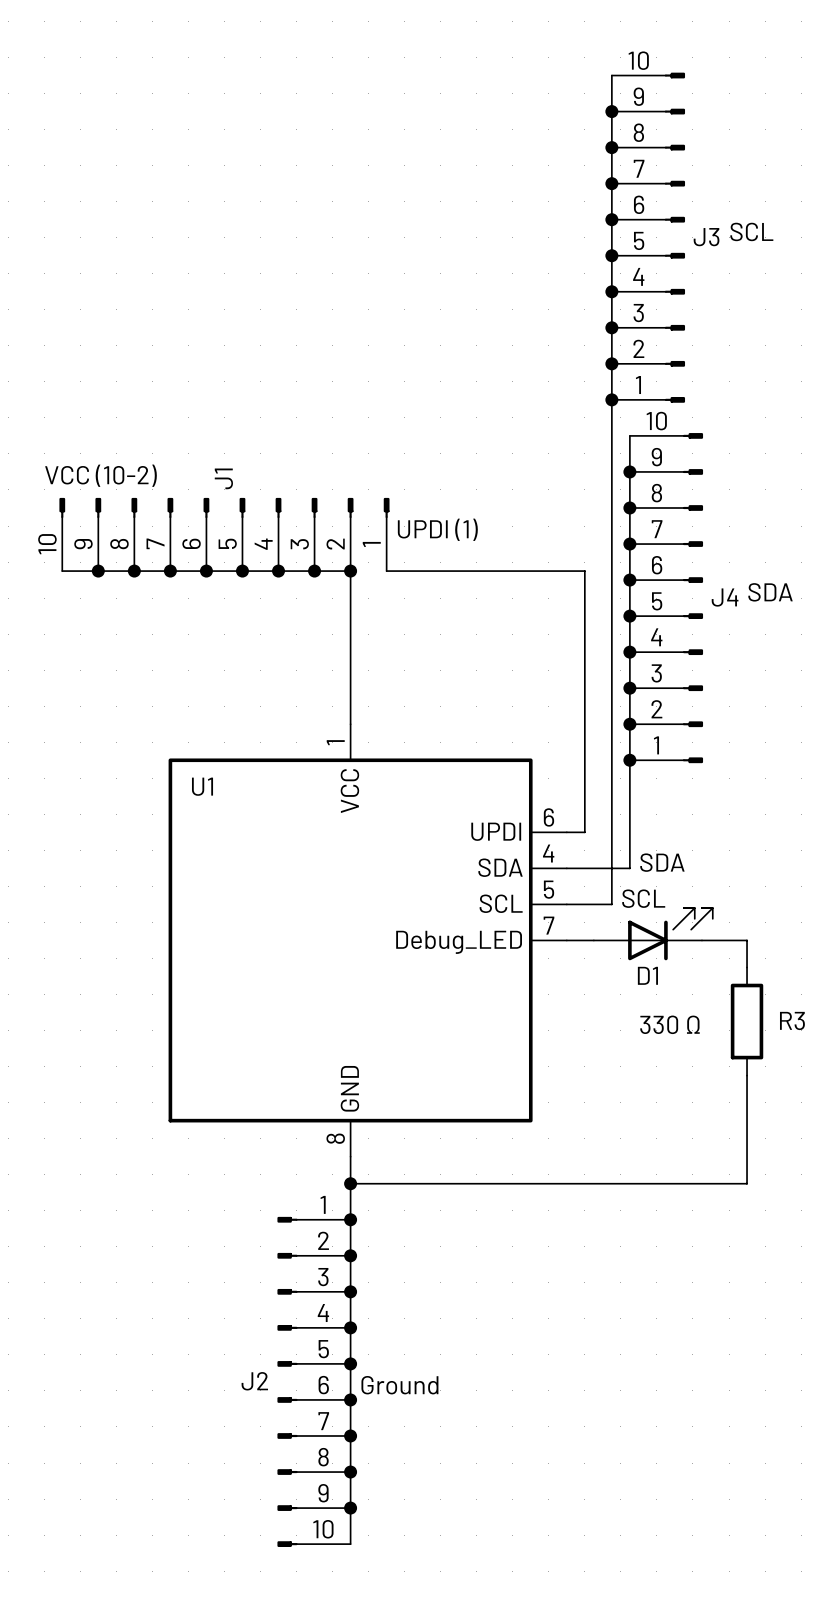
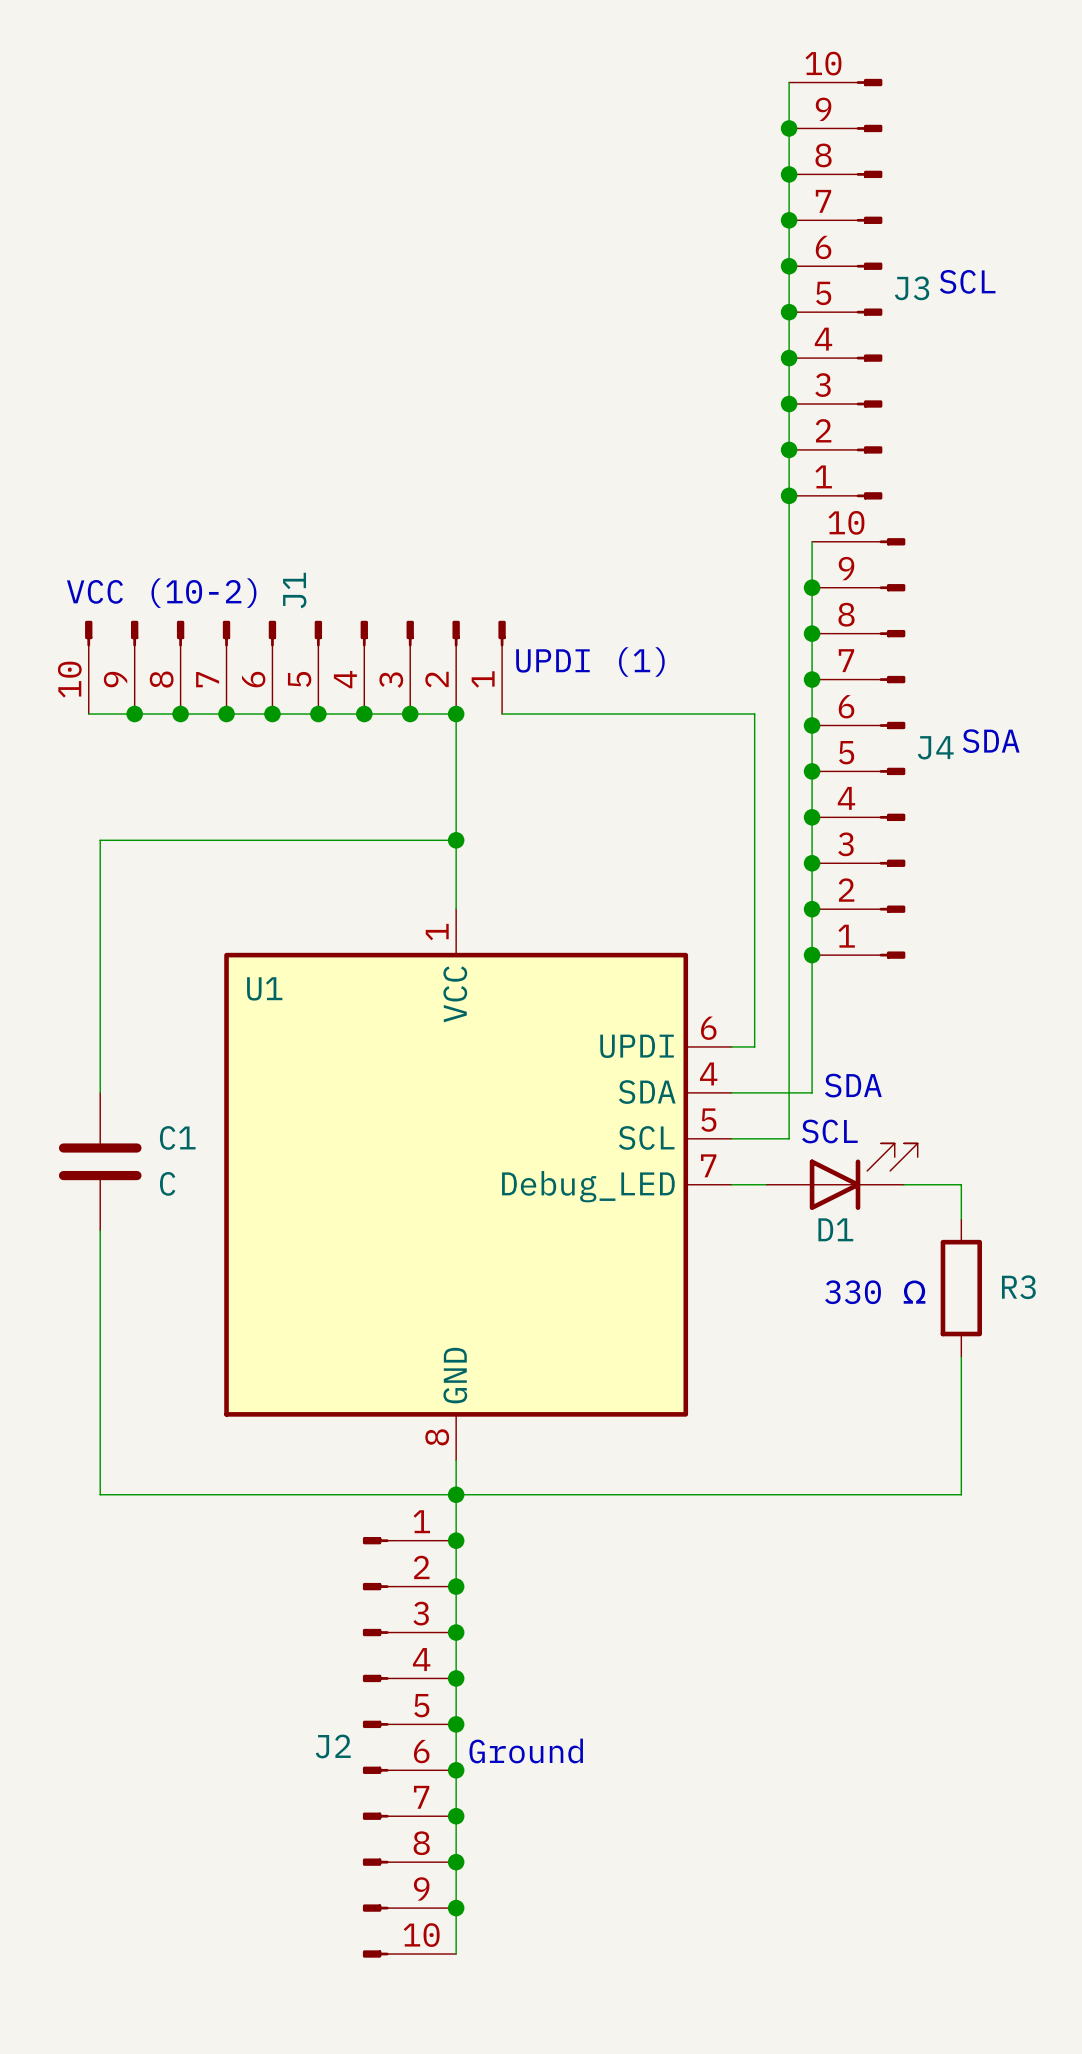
wire: none -> (456, 840) (100, 840) (100, 1092)
junction: none -> (456, 840)
C1: none -> C (100, 1161)
wire: none -> (100, 1230) (100, 1494) (456, 1494)

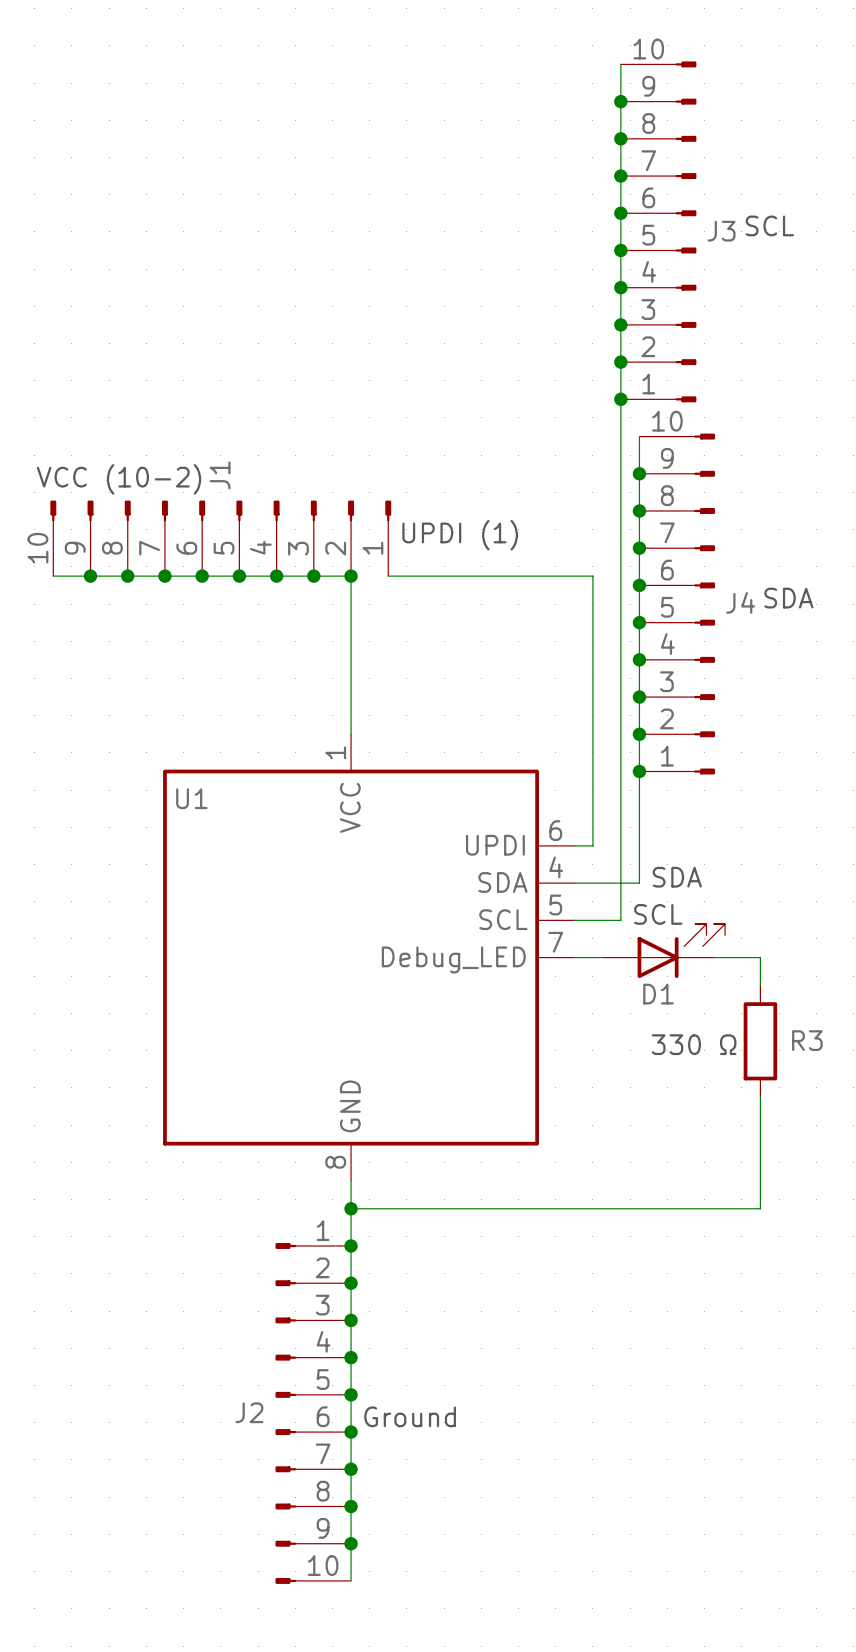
wire: (456, 840) (100, 840) (100, 1092) -> none
junction: (456, 840) -> none
C1: C (100, 1161) -> none
wire: (100, 1230) (100, 1494) (456, 1494) -> none

